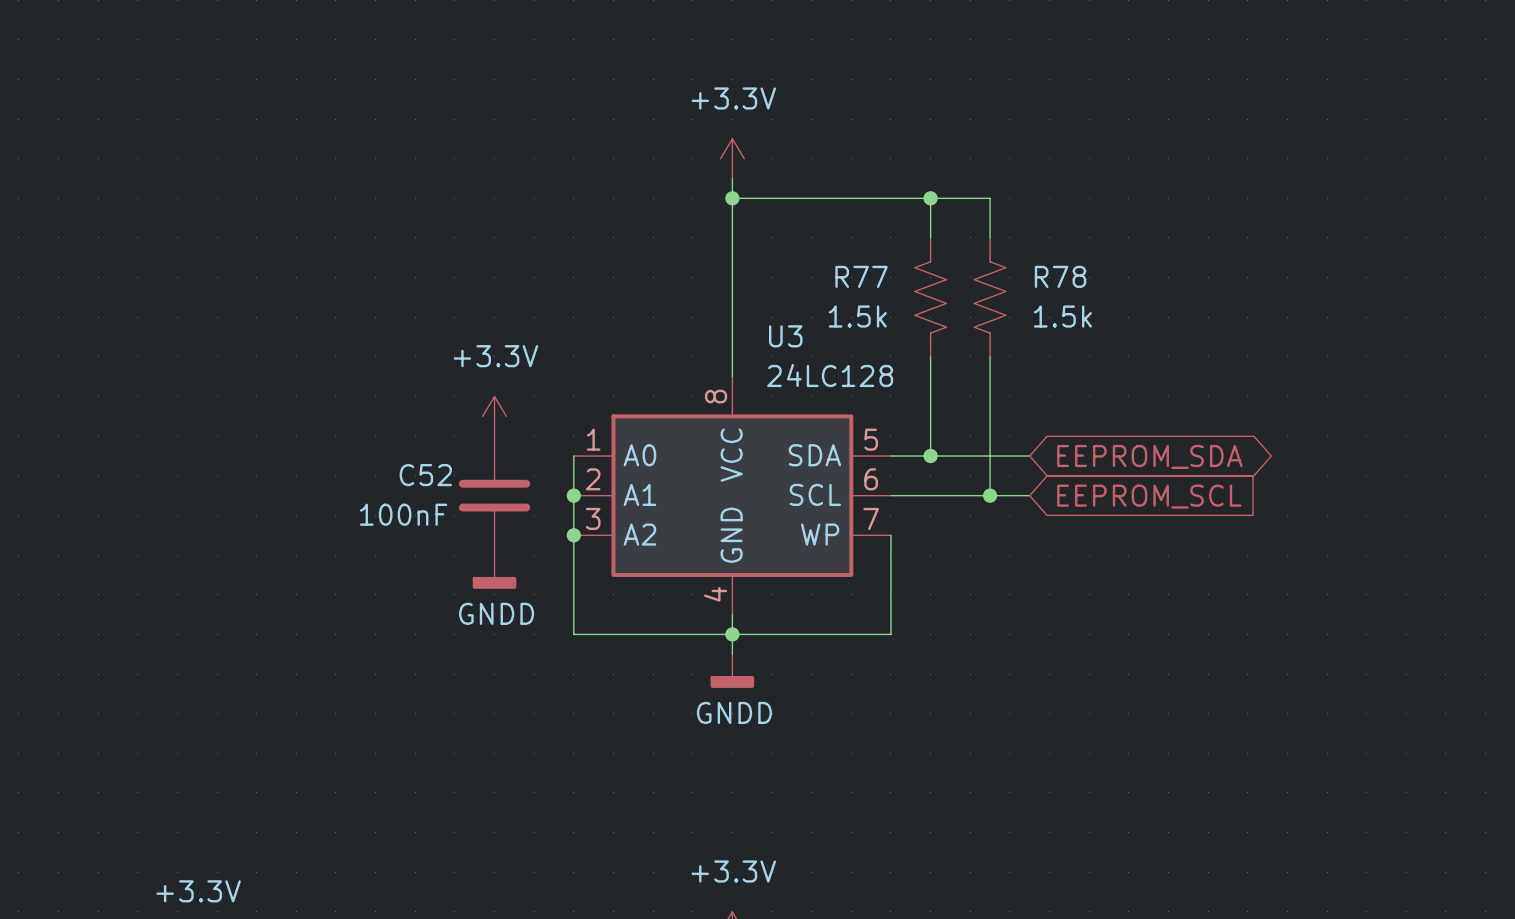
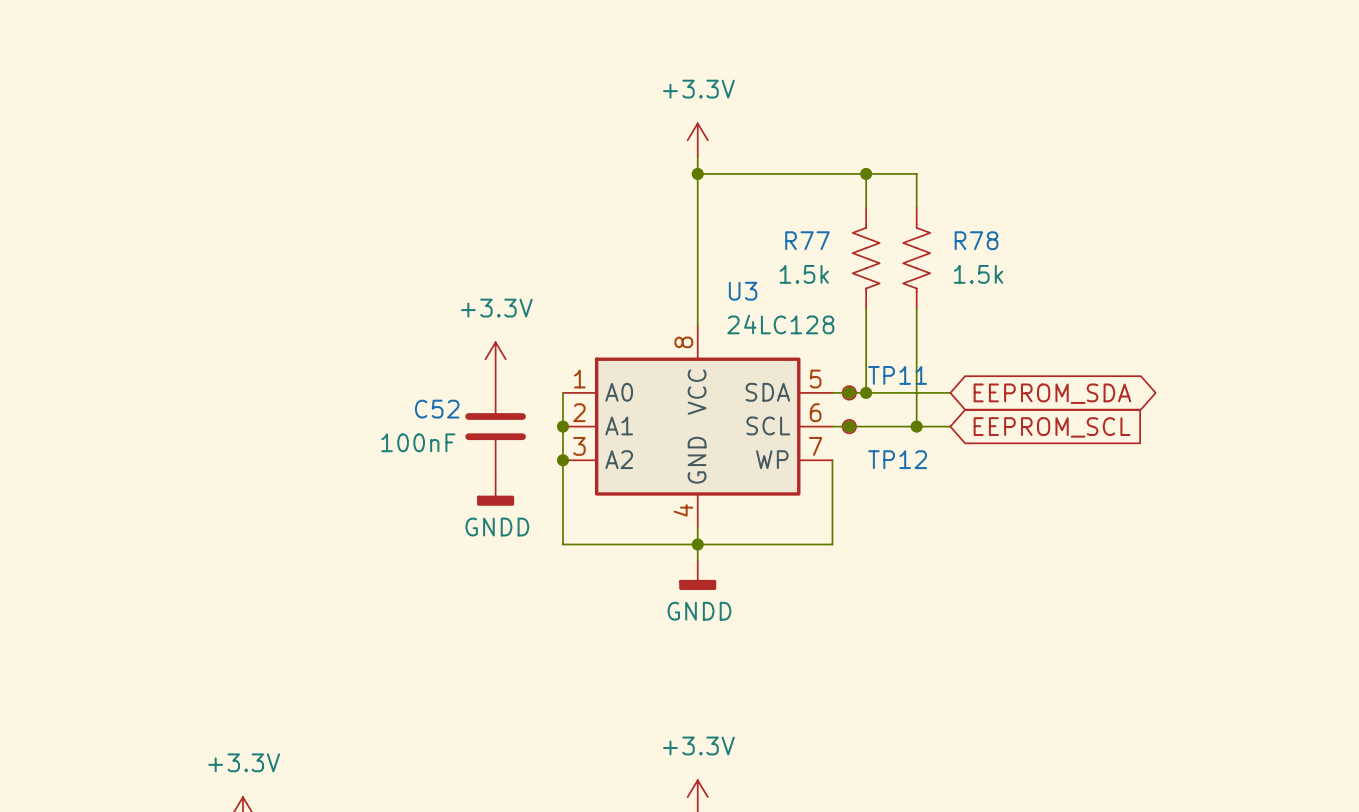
junction: none -> (849, 392)
TP11: none -> (849, 392)
junction: none -> (849, 426)
TP12: none -> (849, 426)

